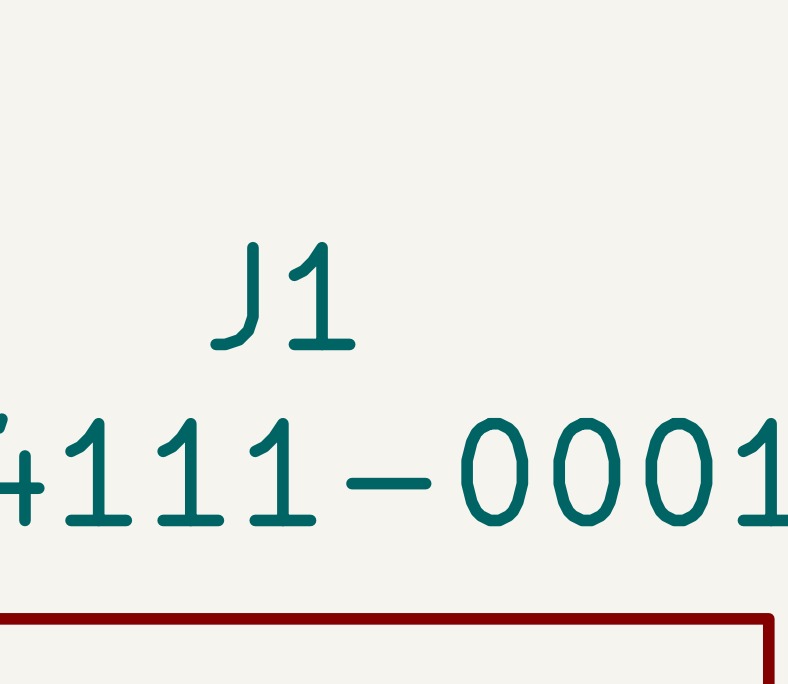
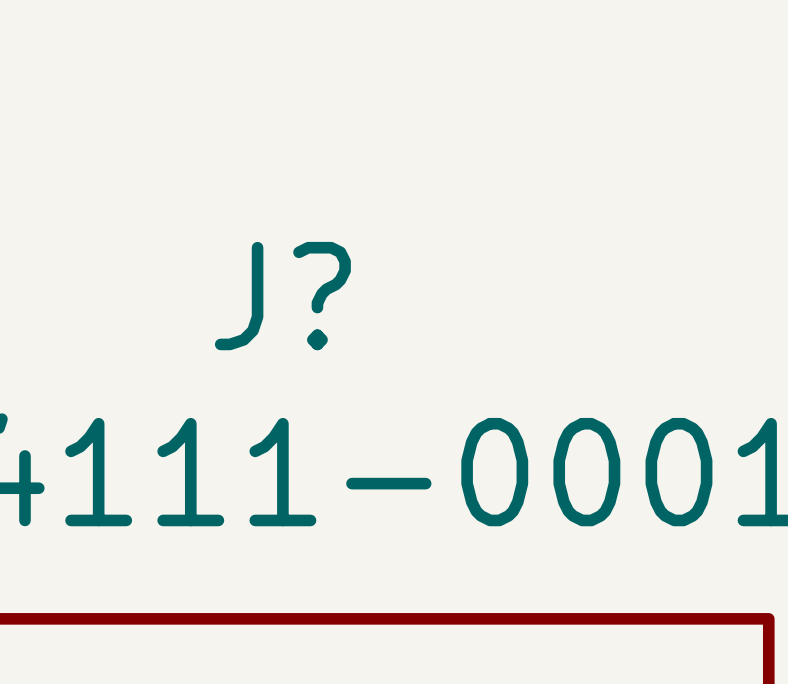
J1 name: J1 (282, 296) -> J? (282, 296)

